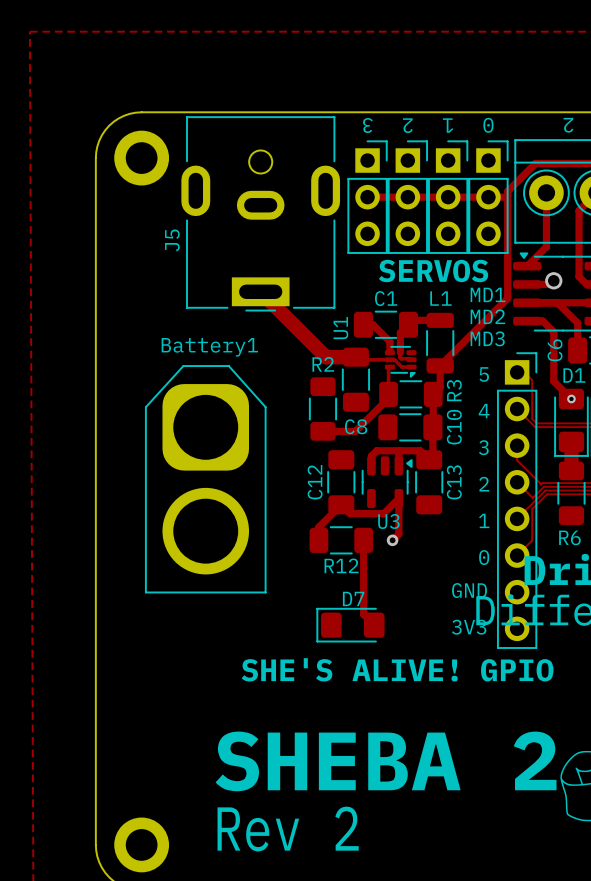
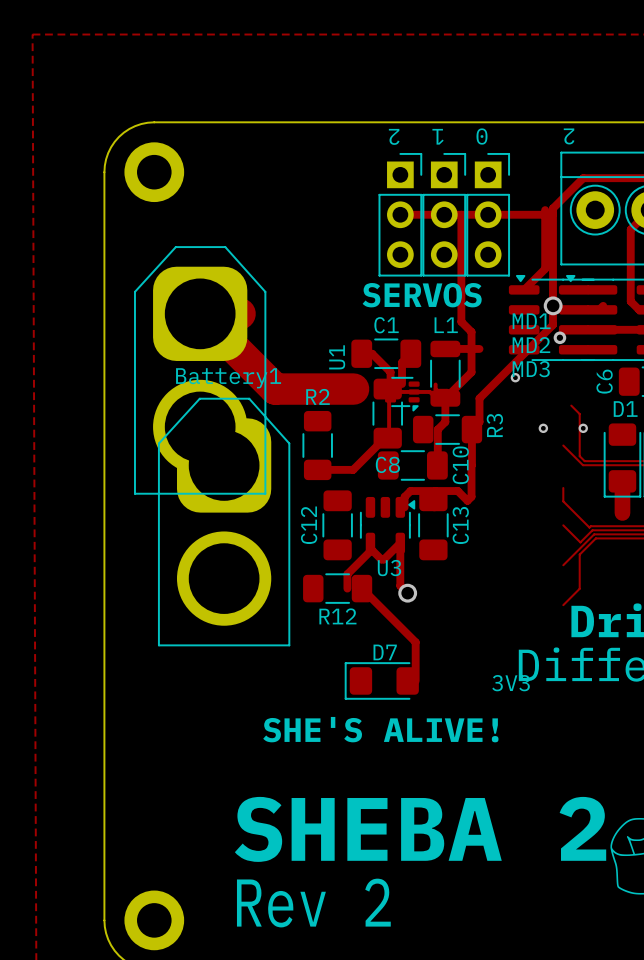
text: 3 (367, 125) -> none
text position: 2 (407, 125) -> 2 (394, 136)
text position: 1 (448, 125) -> 1 (438, 136)
text position: 0 (488, 125) -> 0 (482, 136)
text position: 2 (568, 125) -> 2 (569, 136)
track: (546, 192) (546, 246) (527, 266) -> (545, 210) (545, 268) (524, 289)
track: none -> (461, 214) (461, 321) (471, 331) (471, 372) (445, 398) (445, 422) (437, 429) (437, 465)
part: (488, 197) -> none
J5: (260, 213) -> none
text position: SERVOS (433, 270) -> SERVOS (422, 295)
via: none -> (553, 305)
via: (553, 280) -> none
track: none -> (240, 313) (200, 313) (275, 389) (353, 389)
track: (260, 291) (326, 357) (355, 357) -> none
part: none -> (563, 317)
track: (557, 302) (577, 323) (577, 350) -> none
via: none -> (559, 337)
track: (527, 321) (542, 321) (553, 332) (553, 381) (571, 398) -> none
track: (363, 324) (372, 324) (389, 341) (389, 351) -> (361, 353) (372, 353) (390, 372) (390, 383)
C1 position: (385, 324) -> (386, 353)
track: (408, 324) (400, 332) (400, 352) -> (410, 353) (402, 362) (402, 384)
part: none -> (200, 370)
L1 position: (440, 343) -> (445, 373)
via: none -> (515, 377)
U1 position: (400, 361) -> (402, 394)
track: (389, 367) (388, 394) -> (390, 399) (389, 429)
text: 5 (484, 374) -> none
via: none -> (543, 428)
via: none -> (583, 428)
track: (388, 398) (355, 431) (324, 431) -> (389, 433) (353, 469)
via: (571, 398) -> none
R2 position: (322, 409) -> (317, 445)
text: 4 (484, 411) -> none
C10 position: (410, 427) -> (412, 465)
track: none -> (317, 469) (351, 469)
text: 3 (483, 447) -> none
C12 position: (341, 482) -> (337, 525)
U3 position: (387, 482) -> (387, 525)
C13 position: (429, 482) -> (433, 525)
text: 2 (484, 484) -> none
R6: (571, 493) -> none
part: (517, 500) -> none
track: (352, 513) (383, 513) (398, 498) (398, 534) (392, 540) -> (383, 559) (400, 543) (400, 585) (407, 593)
text: 1 (484, 520) -> none
track: none -> (361, 588) (415, 642) (415, 680)
R12 position: (341, 540) -> (337, 588)
track: (363, 540) (363, 614) (374, 625) -> none
via: (392, 540) -> none
via: none -> (407, 593)
text: 0 (484, 557) -> none
text: GND (469, 590) -> none
text: GPIO (517, 670) -> none

